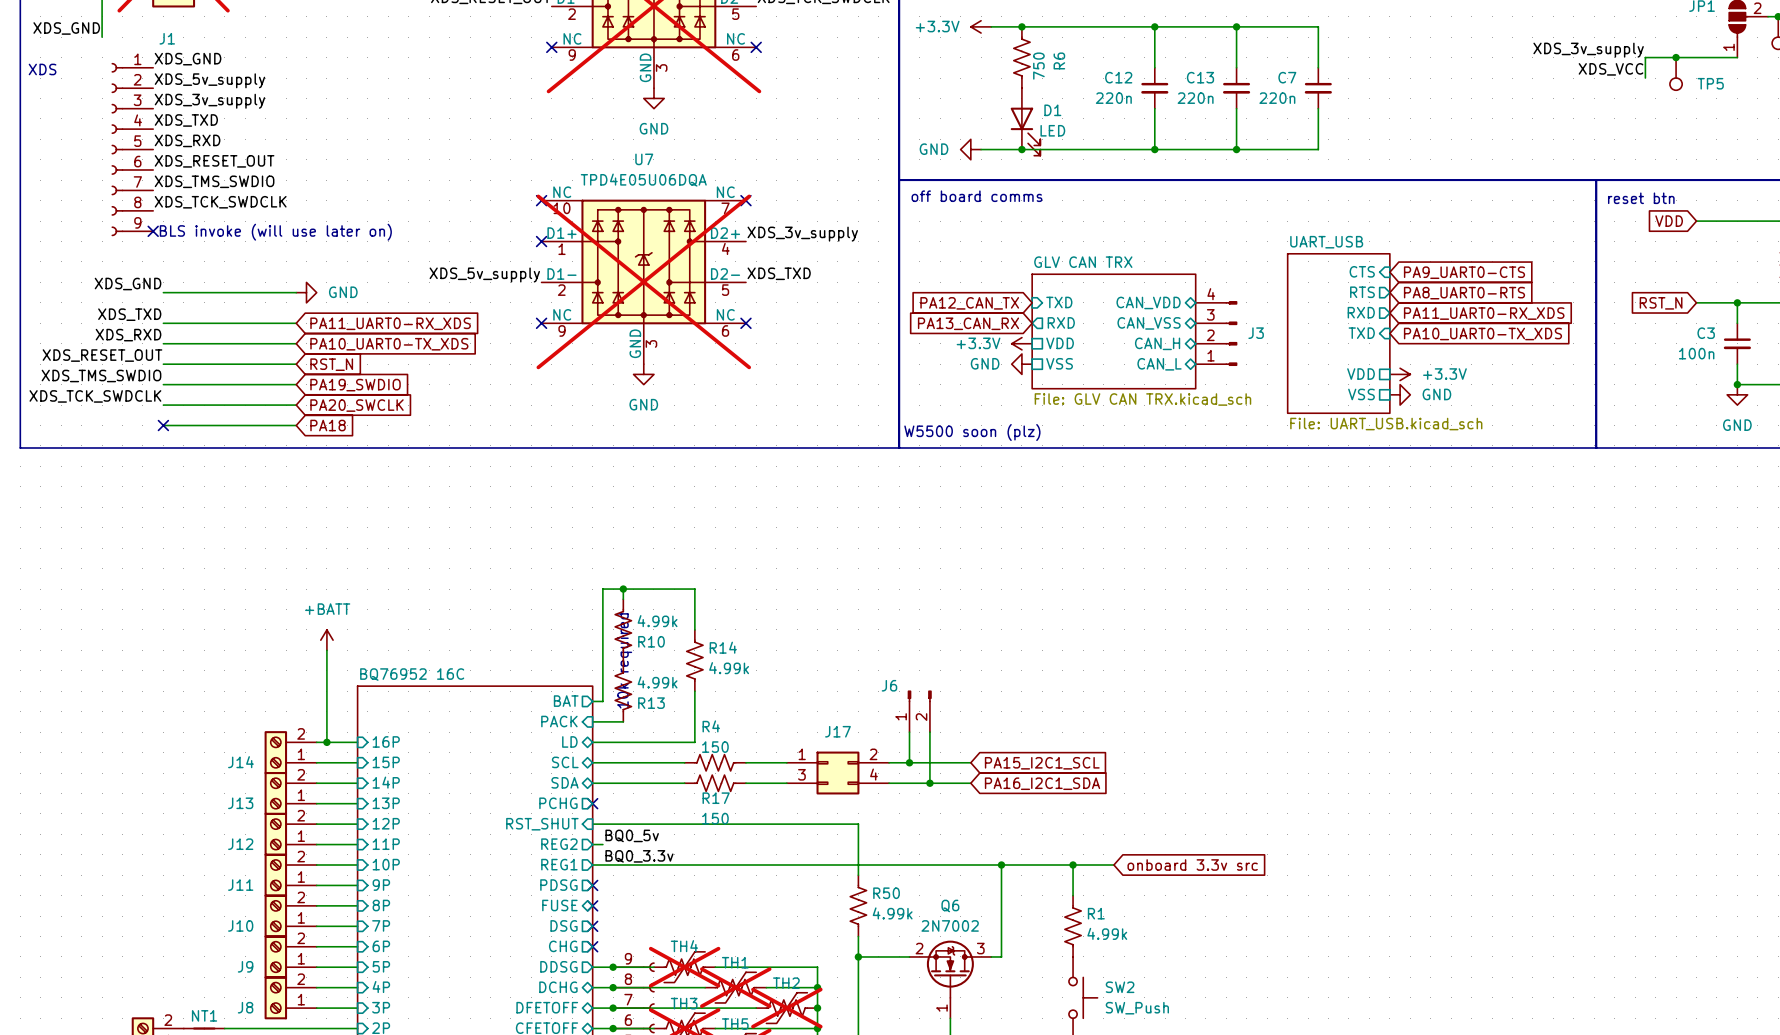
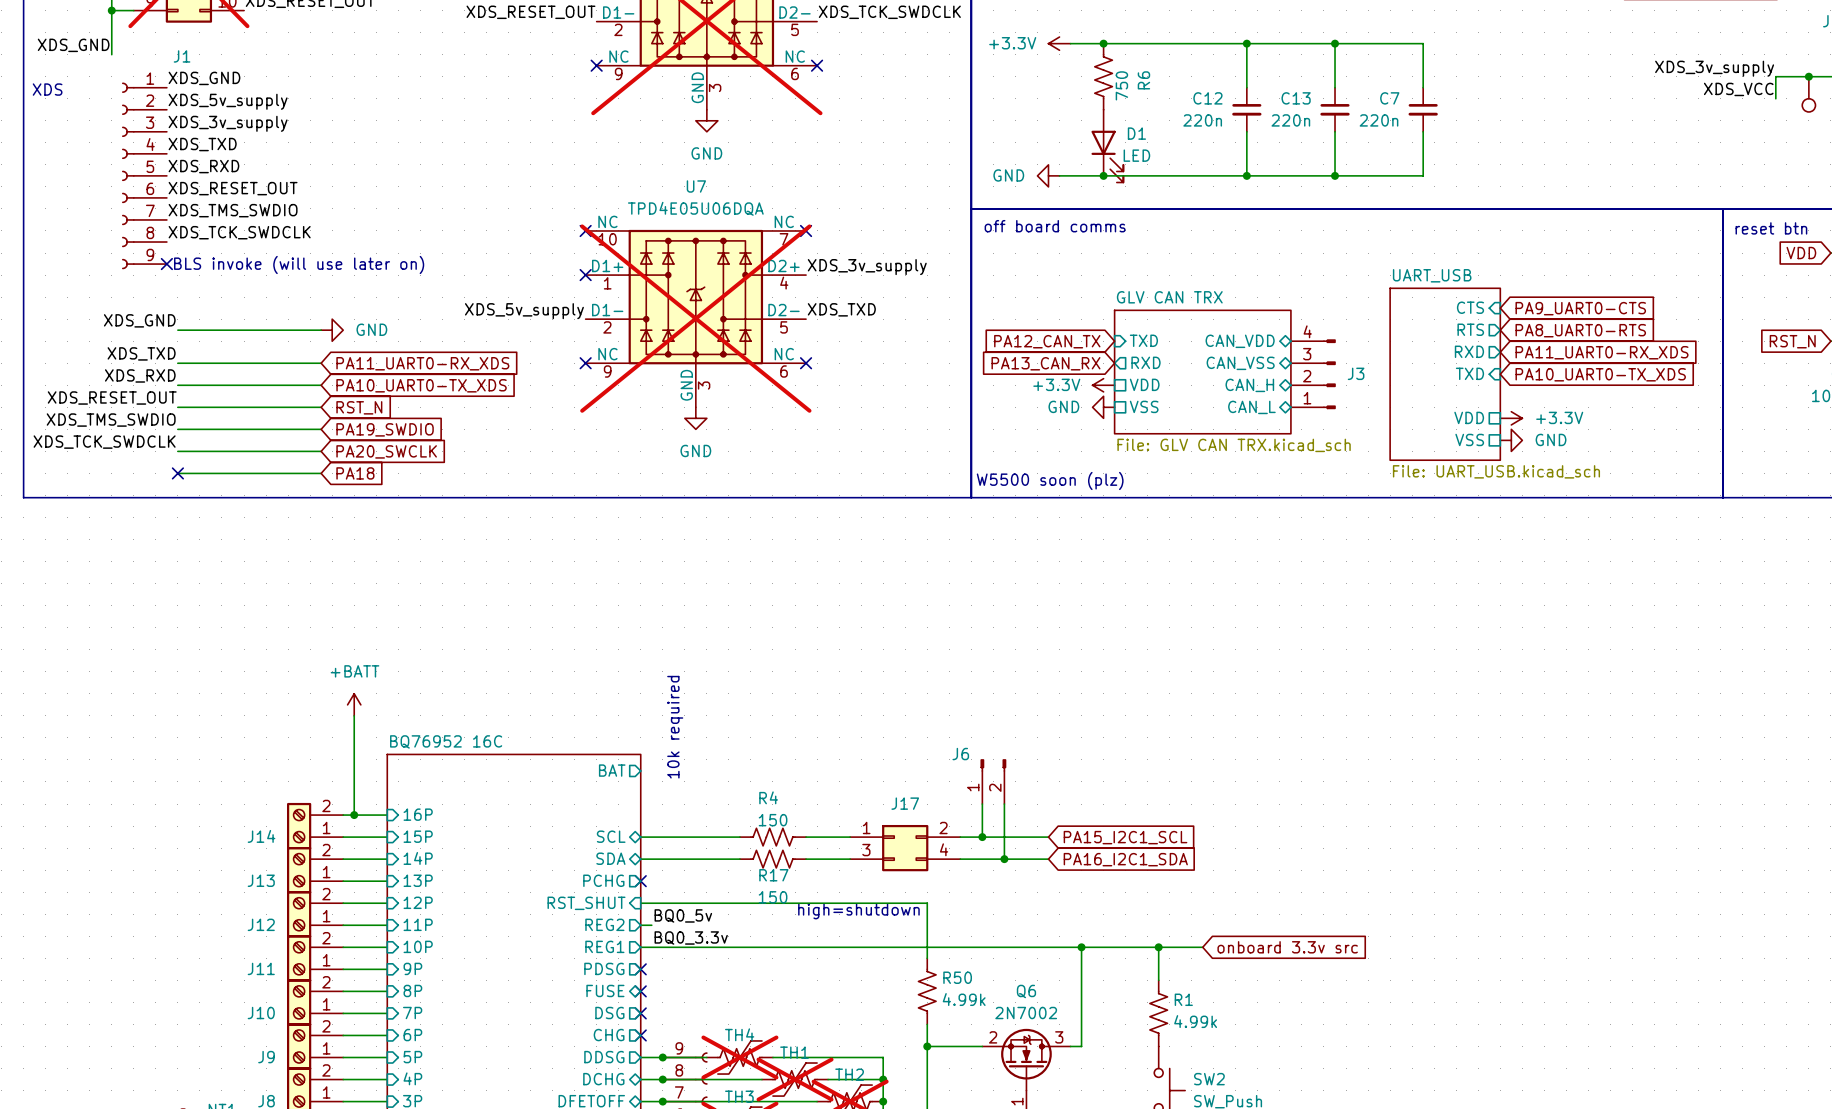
wire: (623, 589) (623, 599) -> none
junction: (623, 589) -> none
R10: 4.99k (623, 629) -> none
wire: (694, 629) (694, 589) (602, 589) (602, 701) (592, 701) -> none
R14: 4.99k (694, 660) -> none
R13: 4.99k (623, 691) -> none
wire: (694, 691) (694, 742) (592, 742) -> none
sheet pin: PACK (559, 721) -> none
wire: (592, 721) (623, 721) -> none
sheet pin: LD (569, 741) -> none
text: none -> high=shutdown (858, 911)

